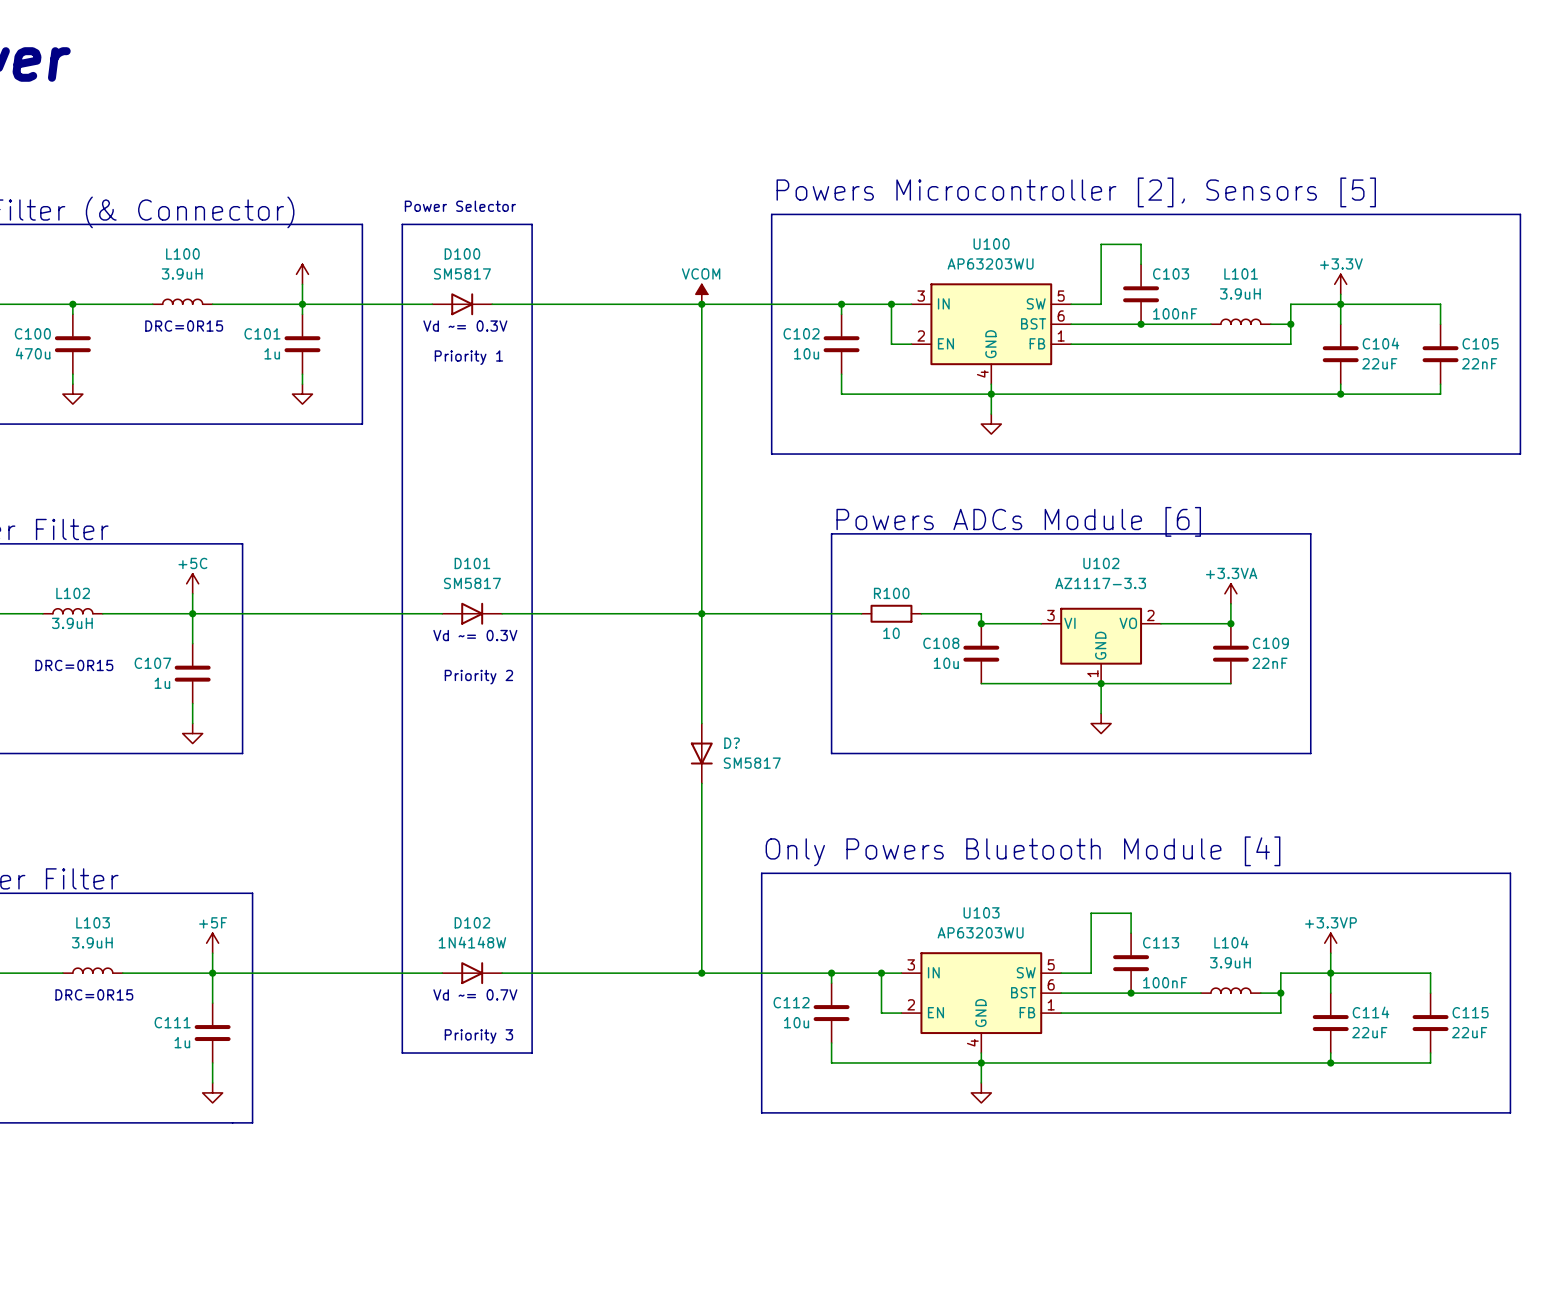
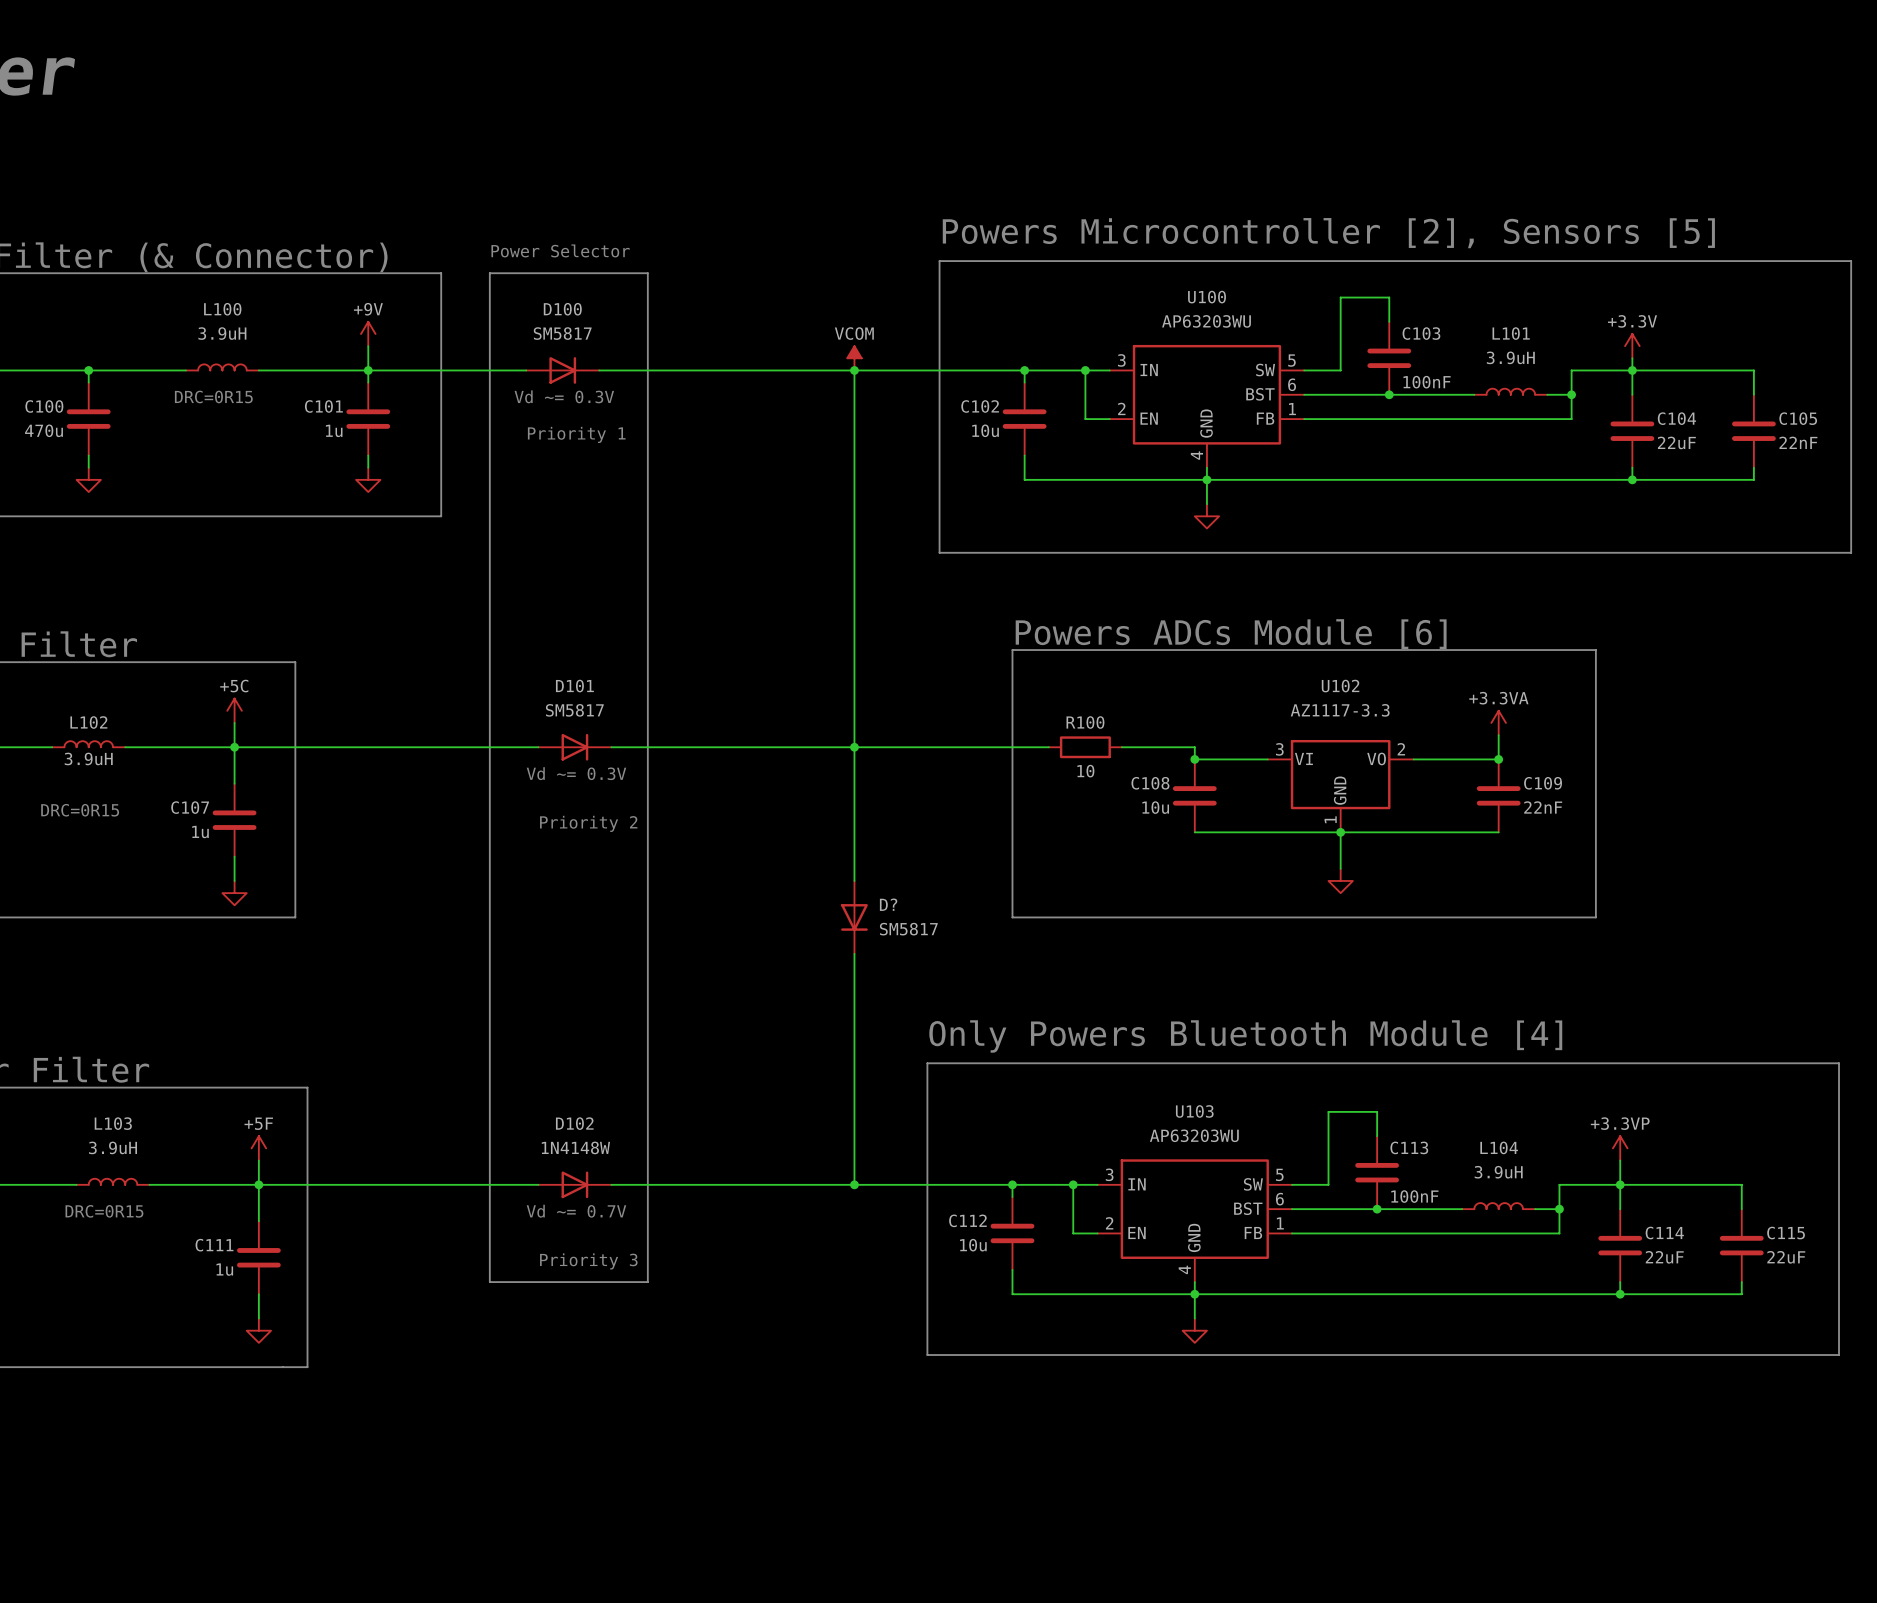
power symbol text: none -> +9V (368, 309)

